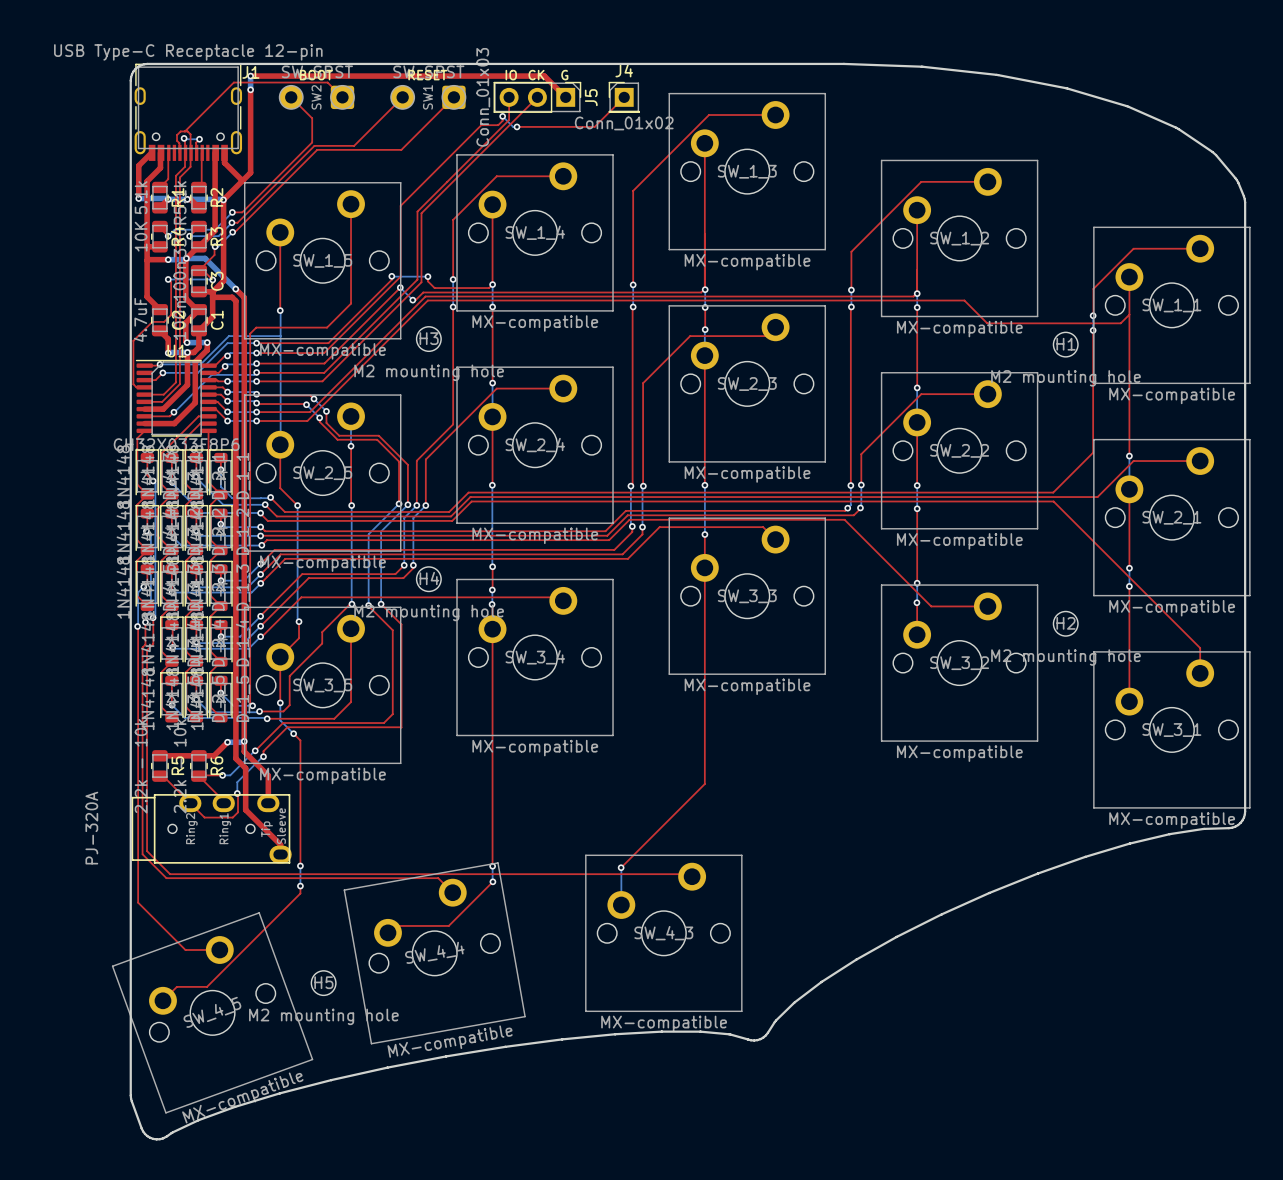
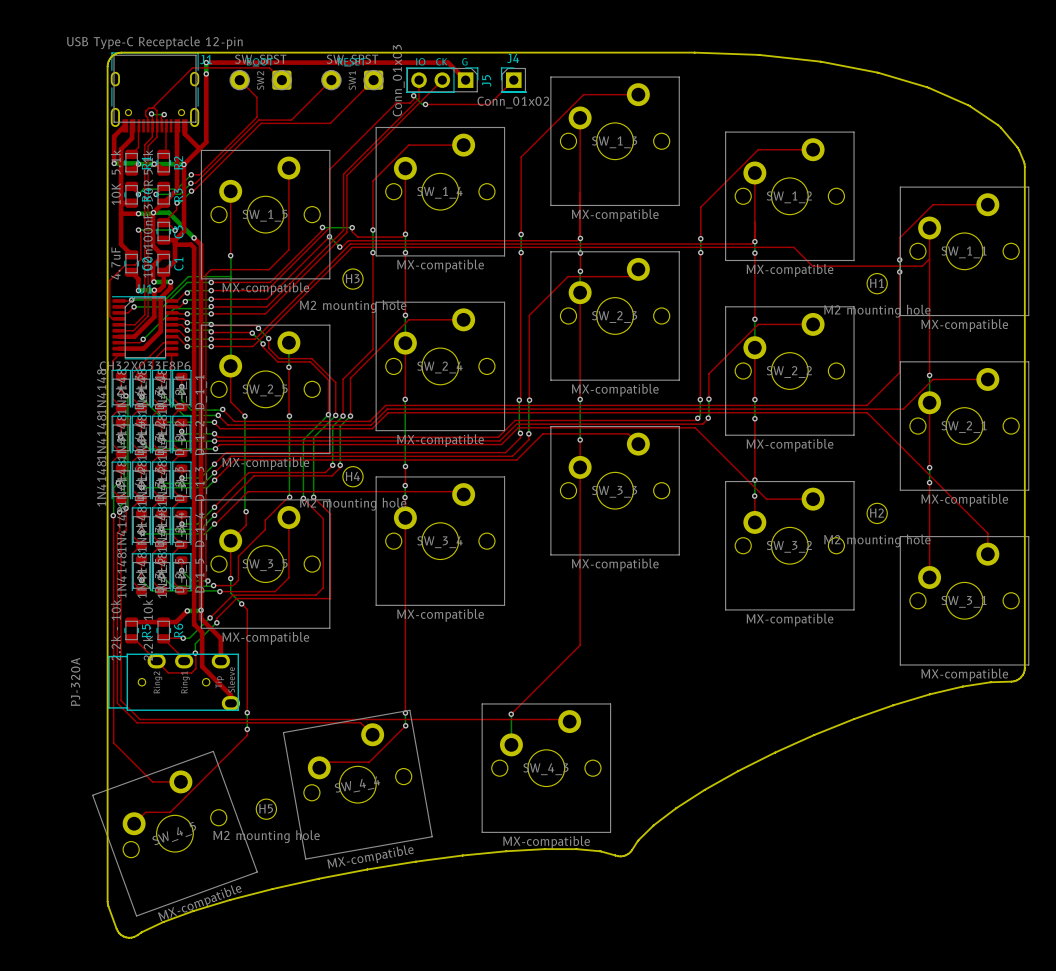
C3 value: 100n (179, 281) -> 100nF (148, 231)

